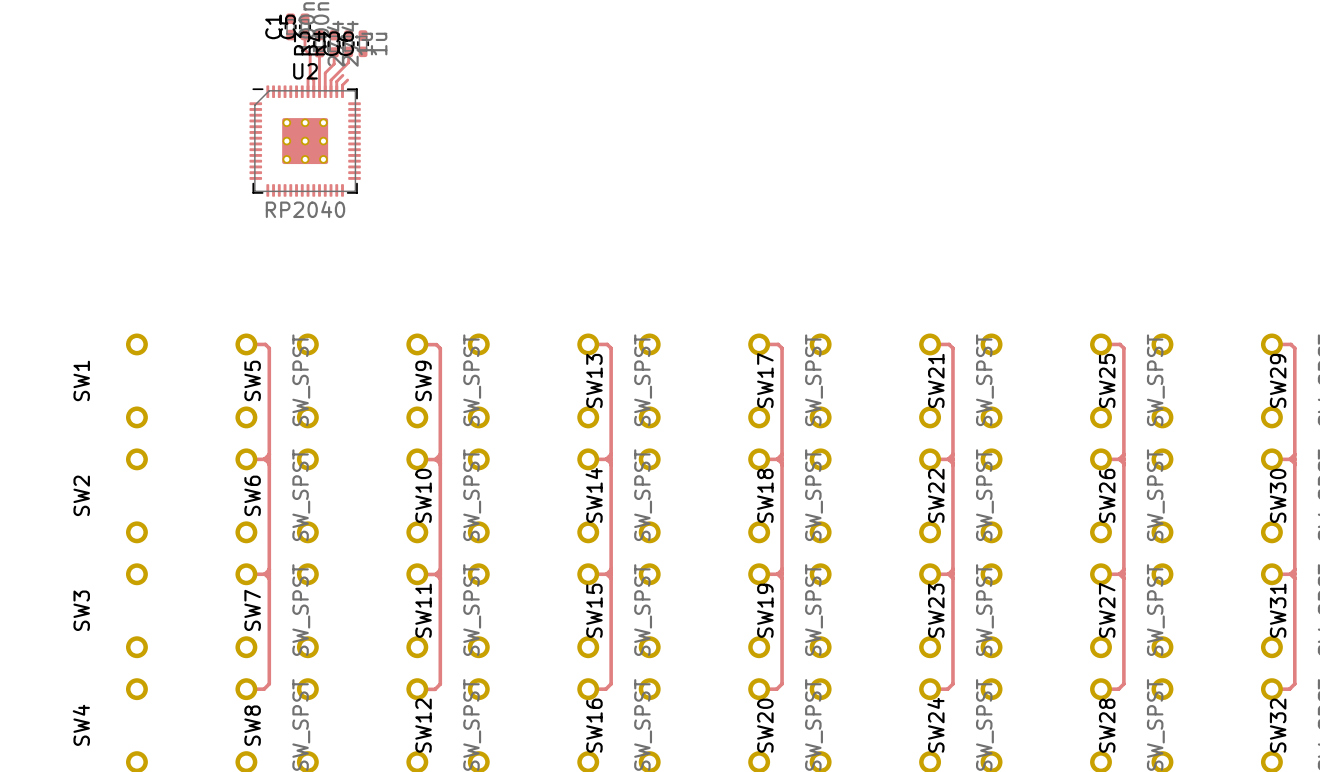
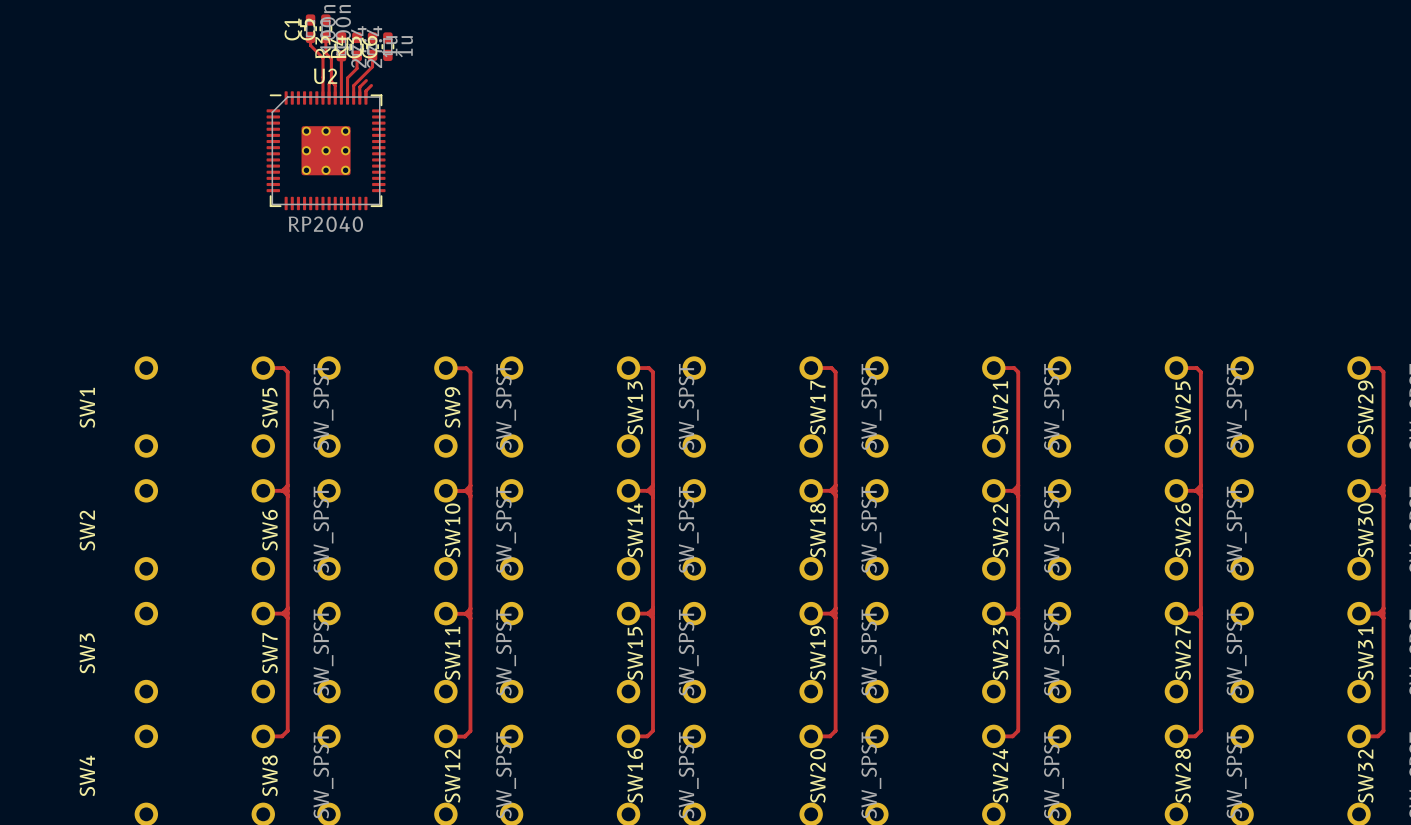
track: none -> (310, 37) (310, 45) (322, 57) (322, 97)

